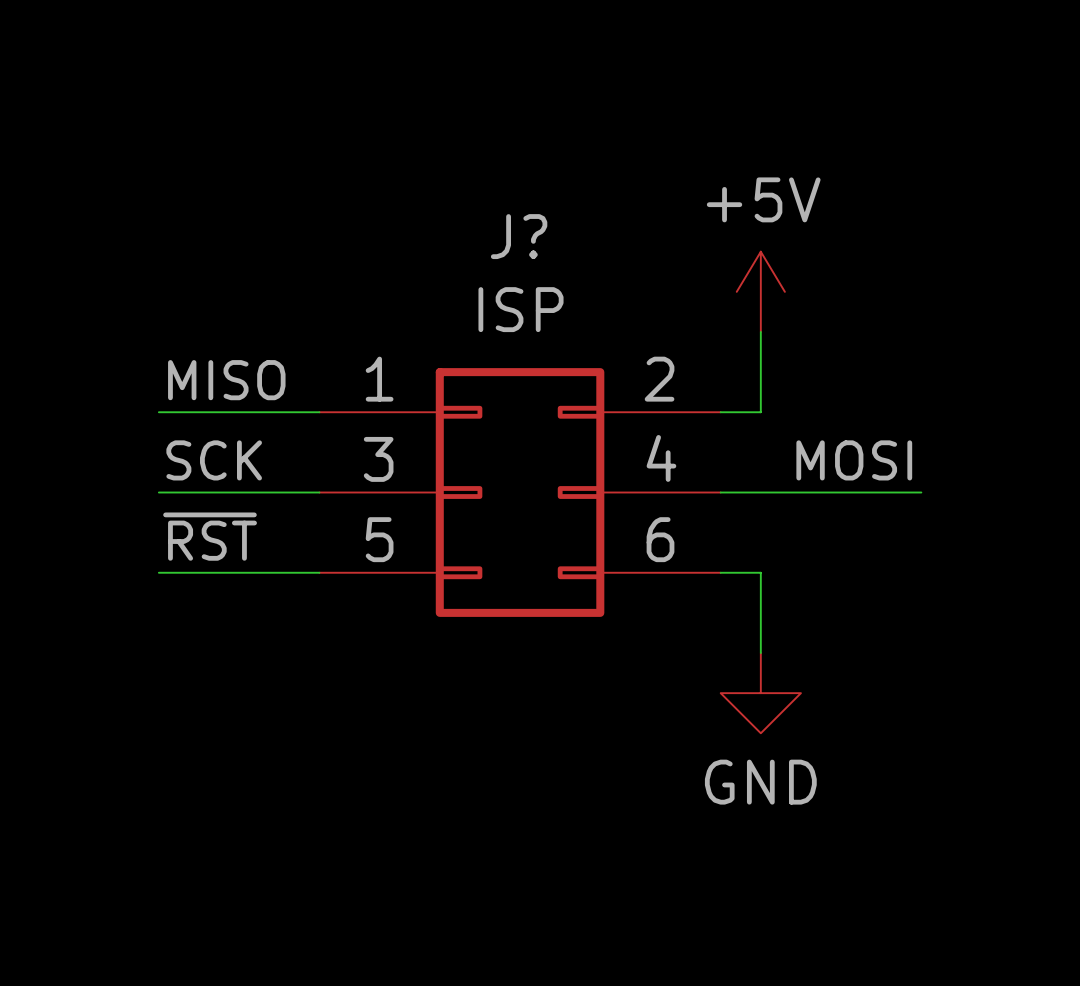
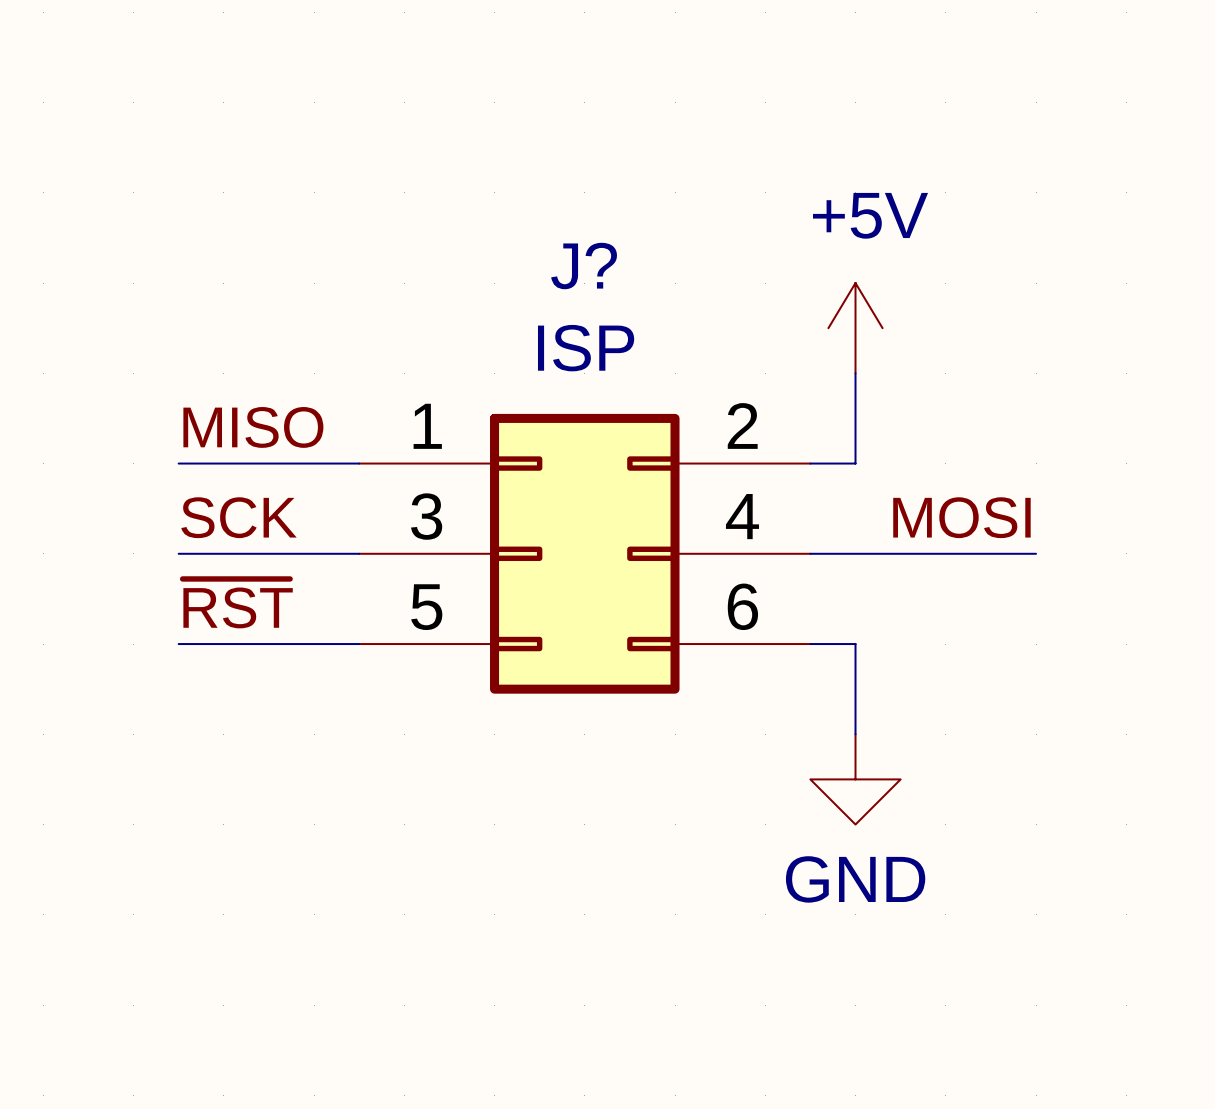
power symbol text position: +5V (763, 199) -> +5V (870, 215)

